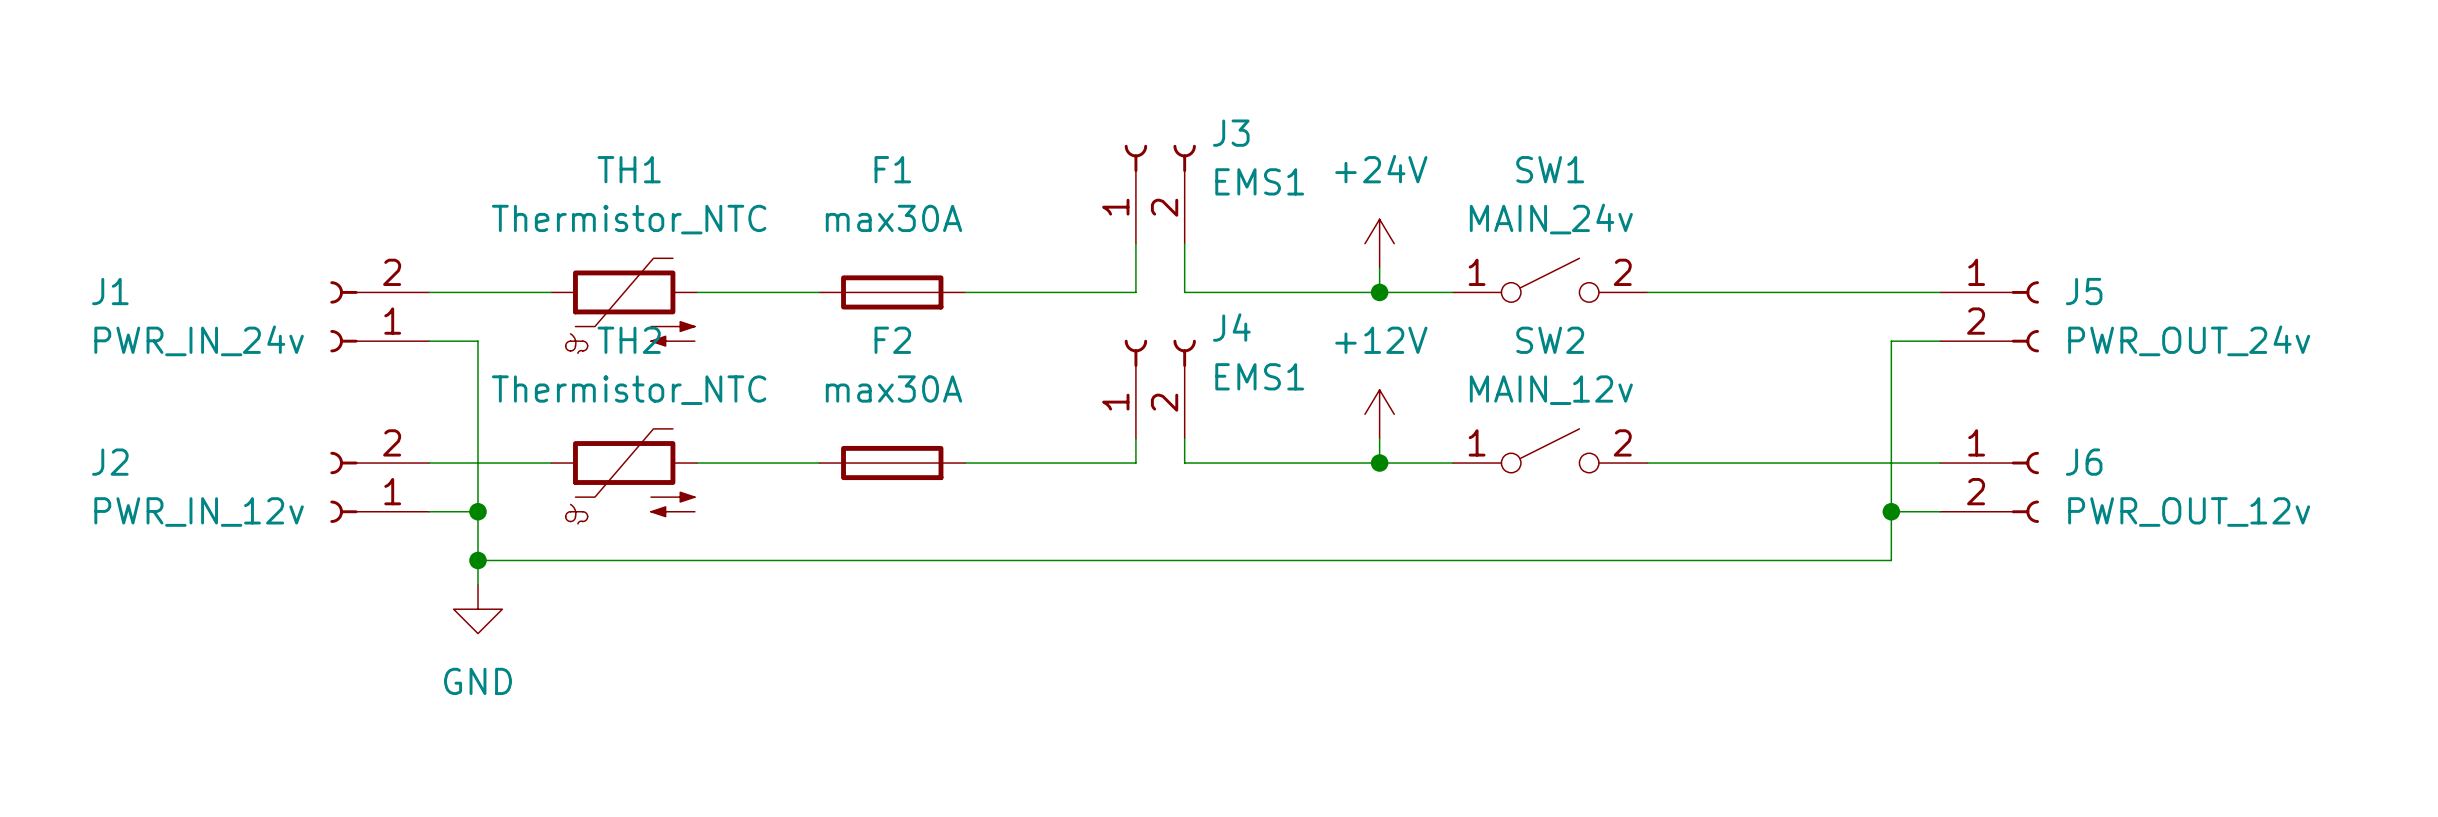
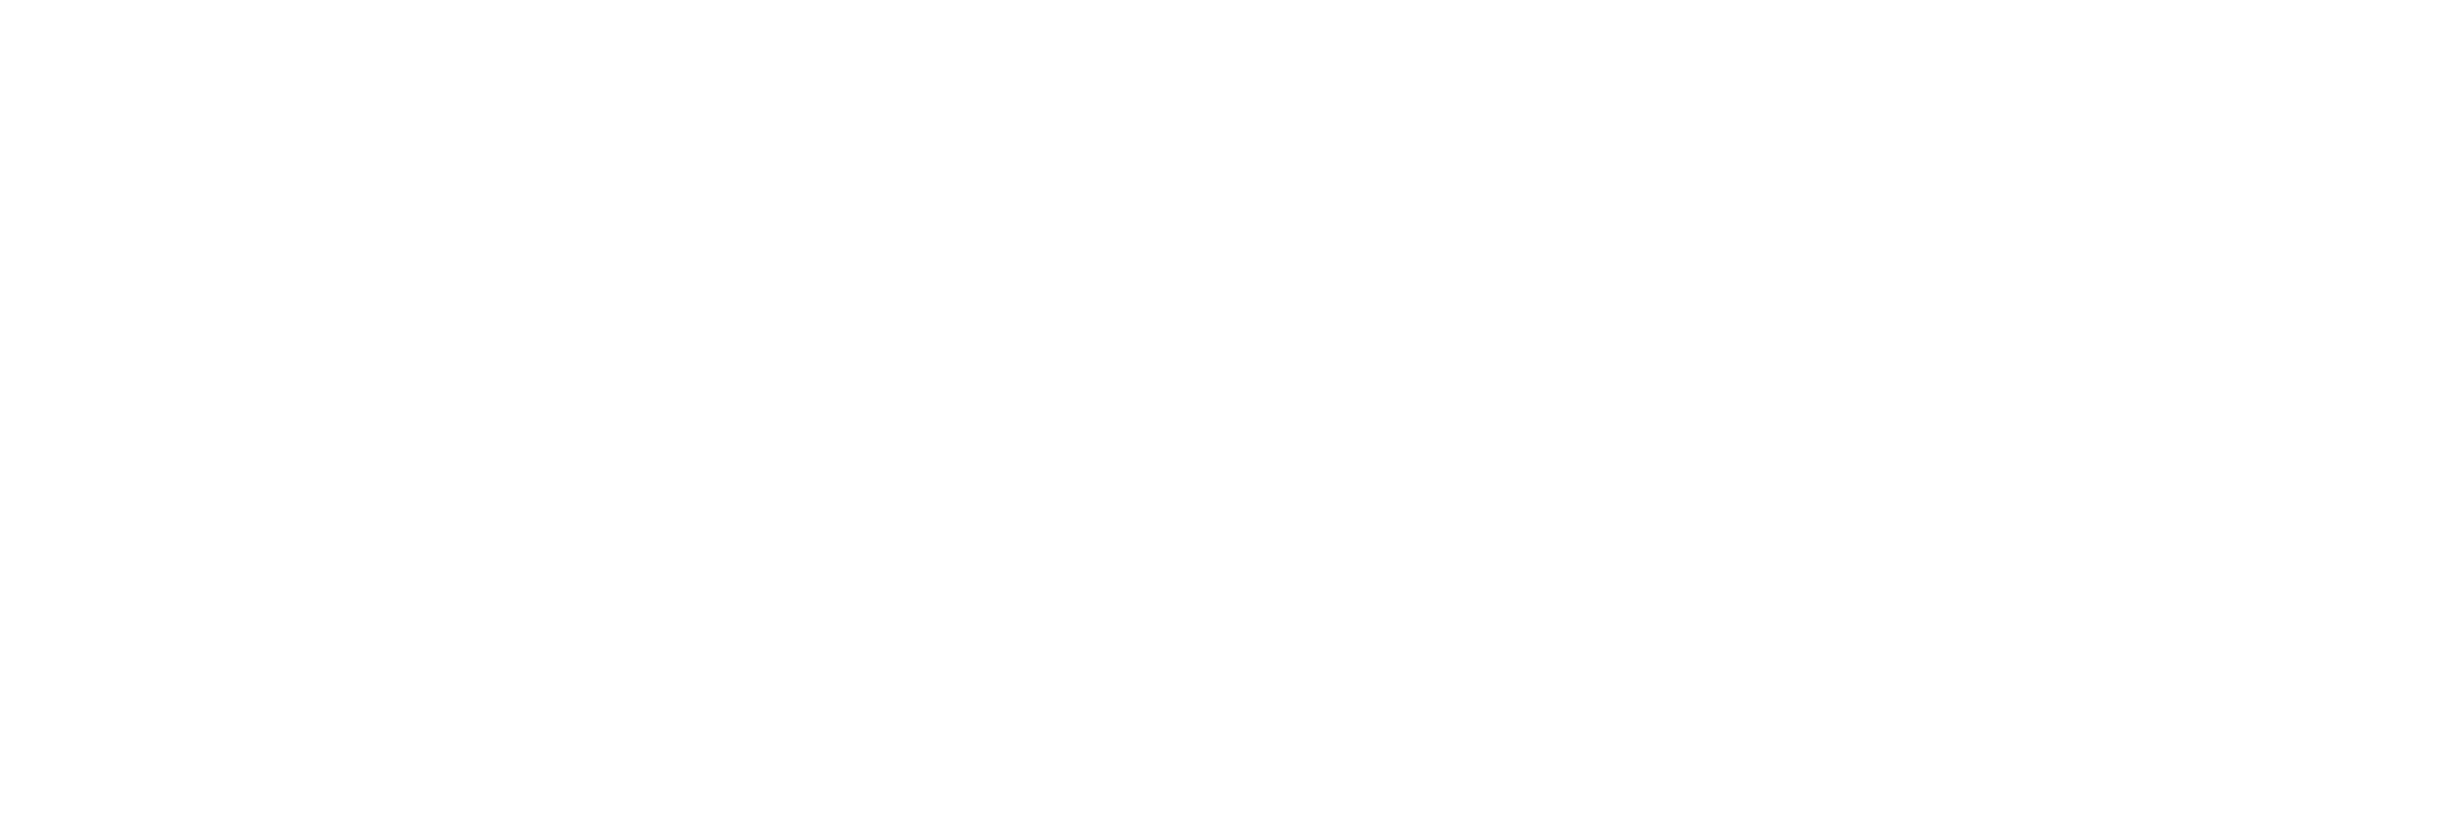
J3: EMS1 (1160, 194) -> none
wire: (1135, 243) (1135, 292) (965, 292) -> none
wire: (1184, 243) (1184, 292) (1452, 292) -> none
power symbol: +24V (1379, 243) -> none
wire: (1379, 268) (1379, 292) -> none
SW1: MAIN_24v (1550, 280) -> none
wire: (429, 292) (551, 292) -> none
wire: (697, 292) (819, 292) -> none
F1: max30A (892, 292) -> none
junction: (1379, 292) -> none
wire: (1647, 292) (1940, 292) -> none
TH1: Thermistor_NTC (624, 305) -> none
J1: PWR_IN_24v (379, 316) -> none
J5: PWR_OUT_24v (1989, 316) -> none
wire: (429, 341) (477, 341) (477, 584) -> none
wire: (1940, 341) (1891, 341) (1891, 560) (477, 560) -> none
J4: EMS1 (1160, 389) -> none
power symbol: +12V (1379, 414) -> none
wire: (1135, 438) (1135, 463) (965, 463) -> none
wire: (1184, 438) (1184, 463) (1452, 463) -> none
wire: (1379, 438) (1379, 463) -> none
SW2: MAIN_12v (1550, 450) -> none
wire: (429, 463) (551, 463) -> none
wire: (697, 463) (819, 463) -> none
F2: max30A (892, 463) -> none
junction: (1379, 463) -> none
wire: (1647, 463) (1940, 463) -> none
TH2: Thermistor_NTC (624, 476) -> none
J2: PWR_IN_12v (379, 487) -> none
J6: PWR_OUT_12v (1989, 487) -> none
wire: (429, 511) (477, 511) -> none
junction: (477, 511) -> none
wire: (1891, 511) (1940, 511) -> none
junction: (1891, 511) -> none
junction: (477, 560) -> none
power symbol: GND (477, 609) -> none

